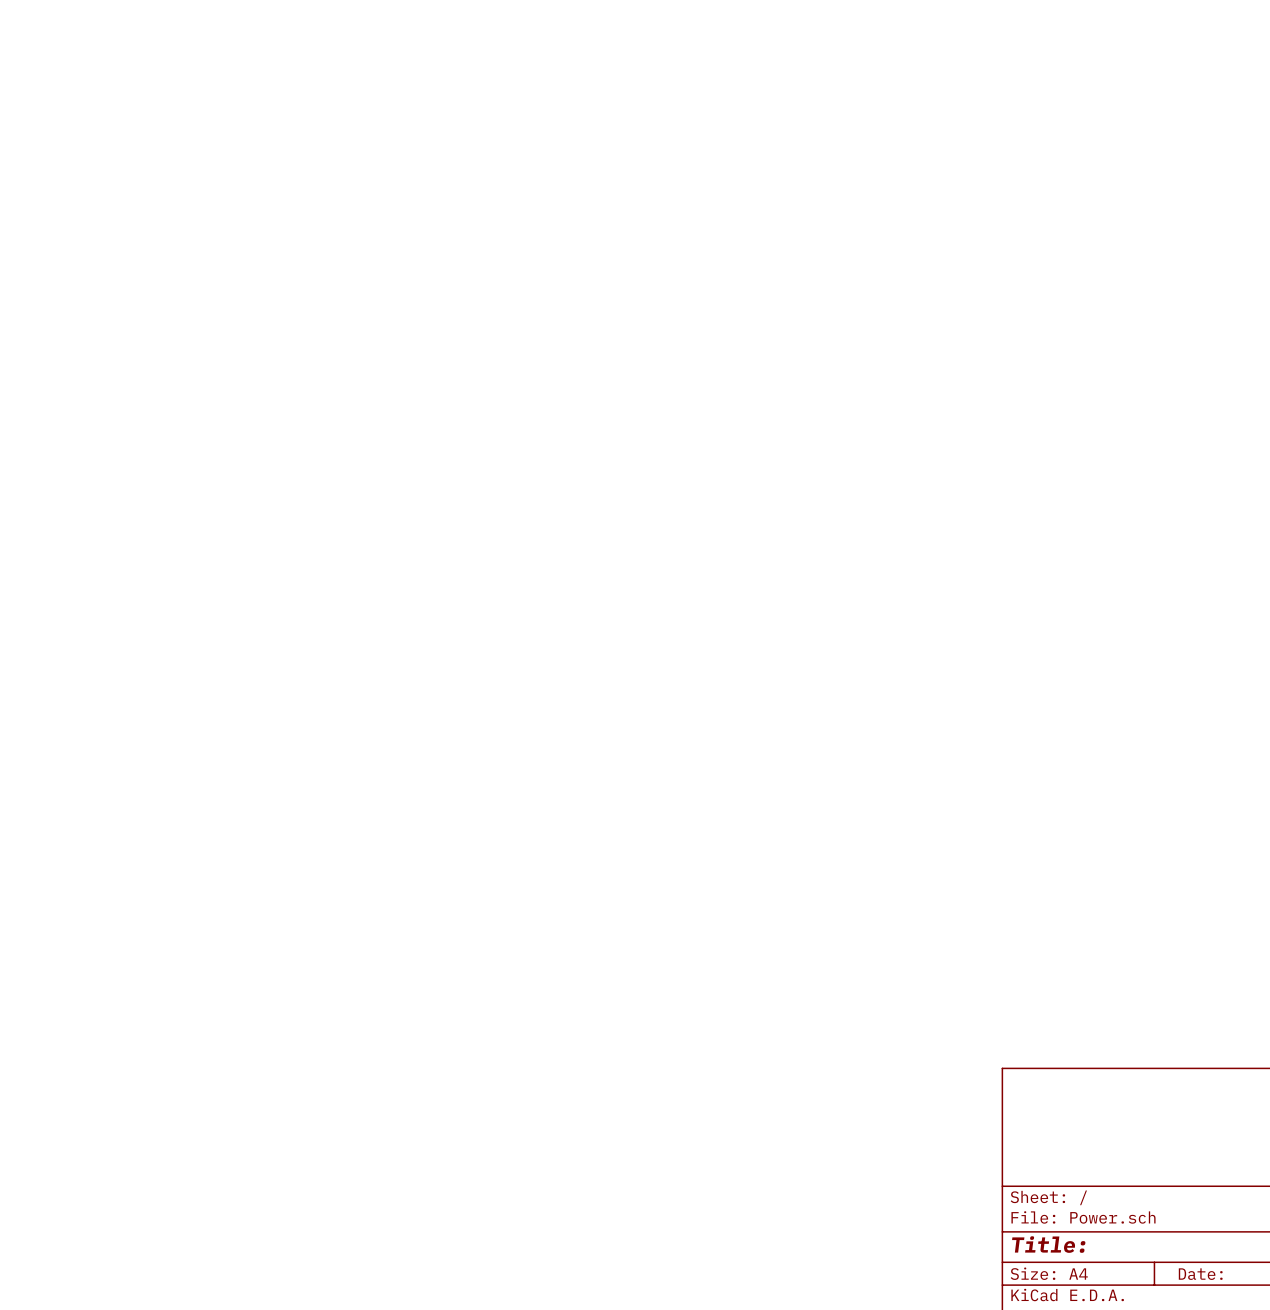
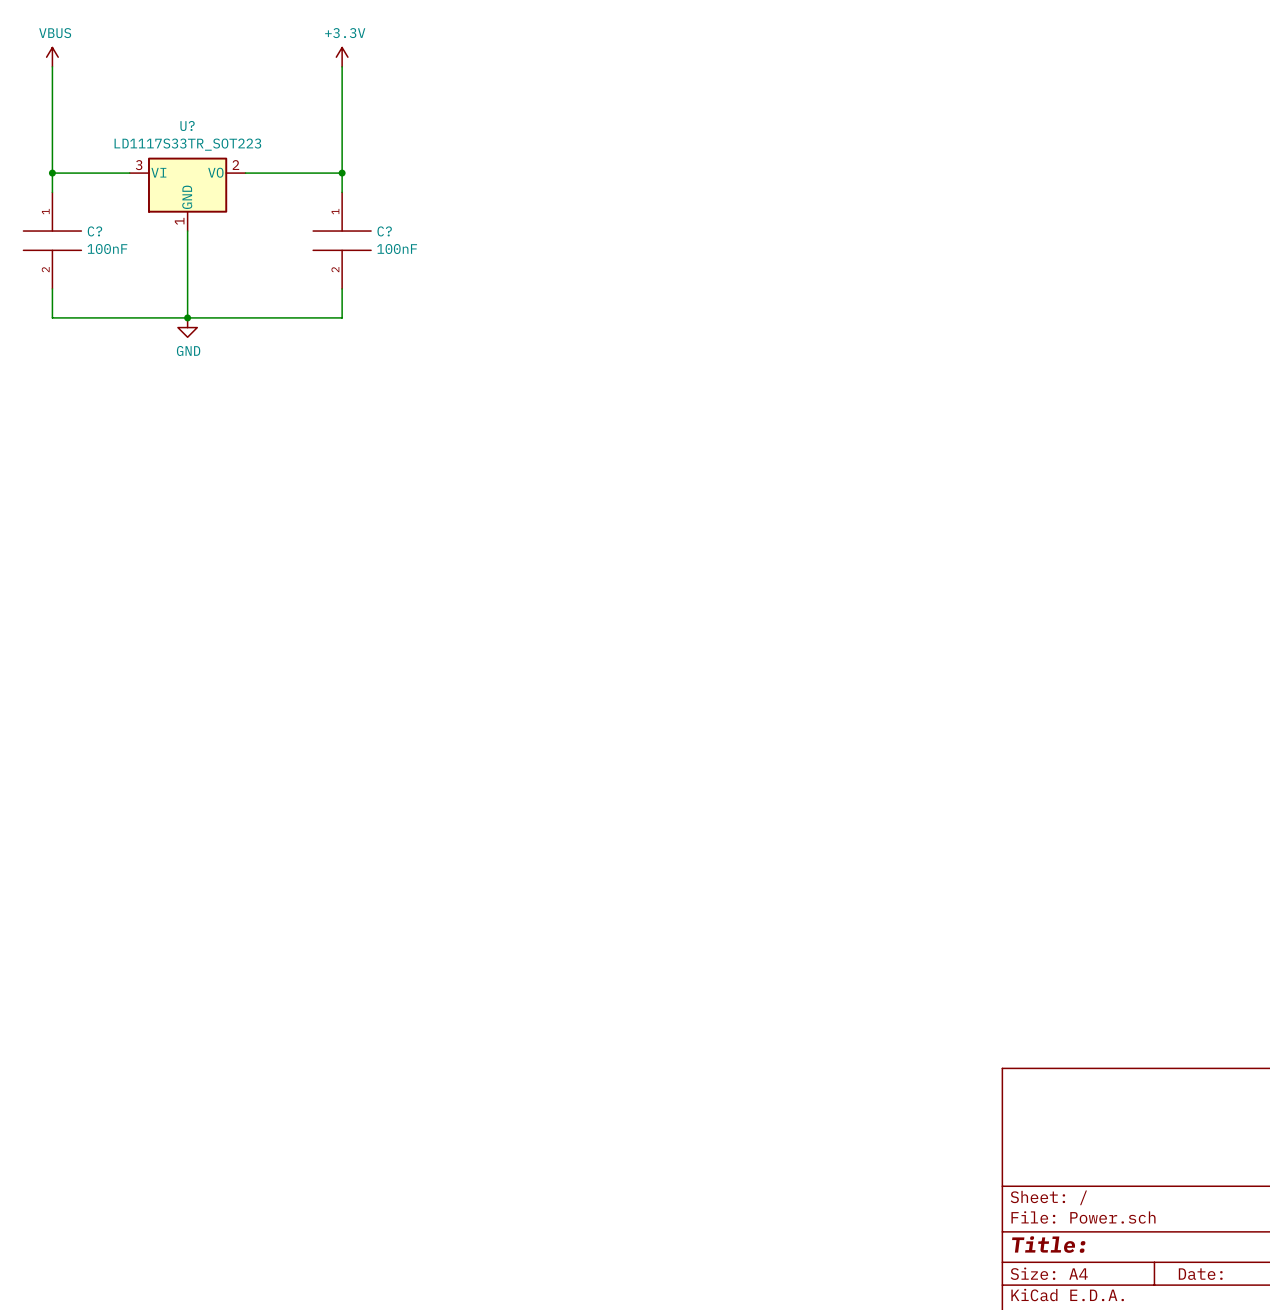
power symbol: none -> VBUS (52, 57)
power symbol: none -> +3.3V (342, 57)
wire: none -> (52, 66) (52, 192)
wire: none -> (342, 66) (342, 192)
wire: none -> (52, 173) (129, 173)
junction: none -> (52, 173)
wire: none -> (245, 173) (342, 173)
junction: none -> (342, 173)
U?: none -> LD1117S33TR_SOT223 (187, 194)
wire: none -> (187, 231) (187, 317)
C?: none -> 100nF (52, 240)
C?: none -> 100nF (342, 240)
wire: none -> (52, 288) (52, 317) (342, 317) (342, 288)
junction: none -> (187, 317)
power symbol: none -> GND (187, 327)

